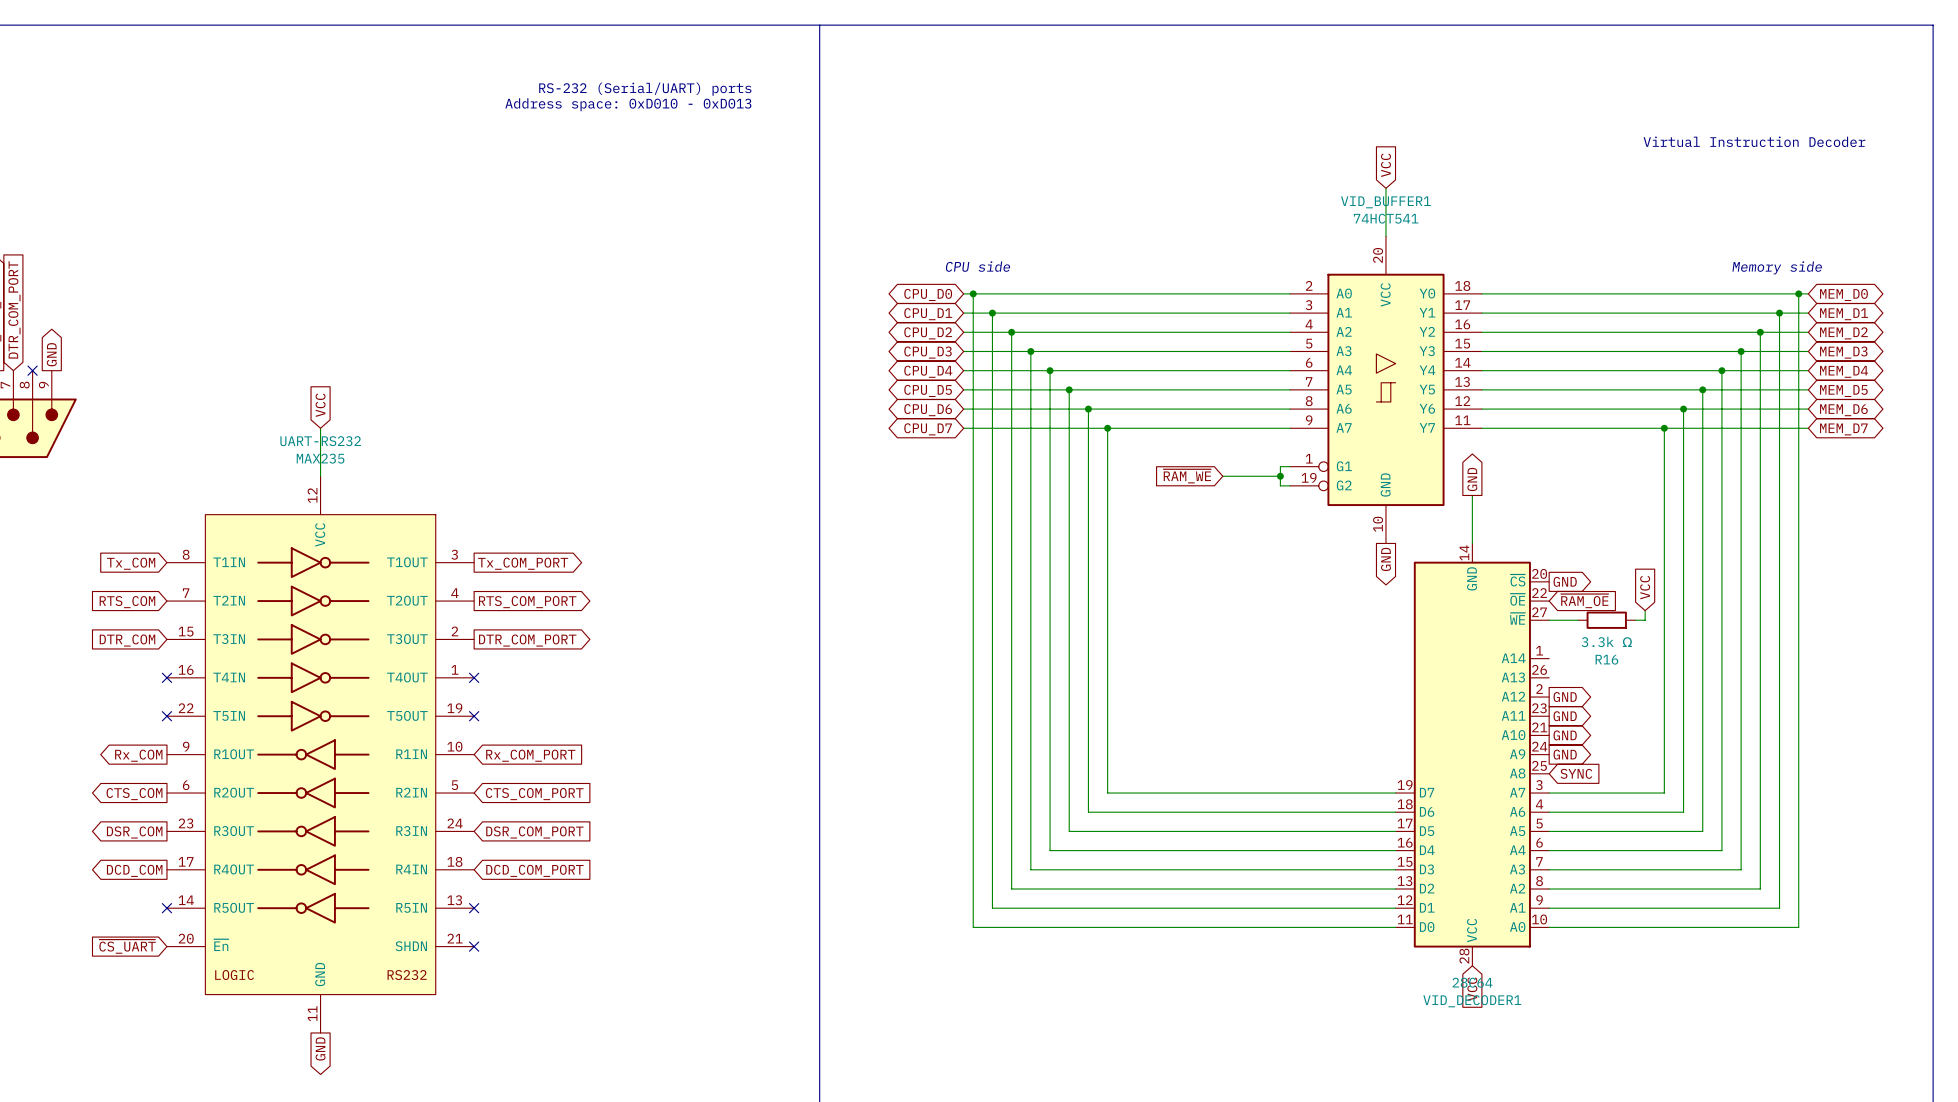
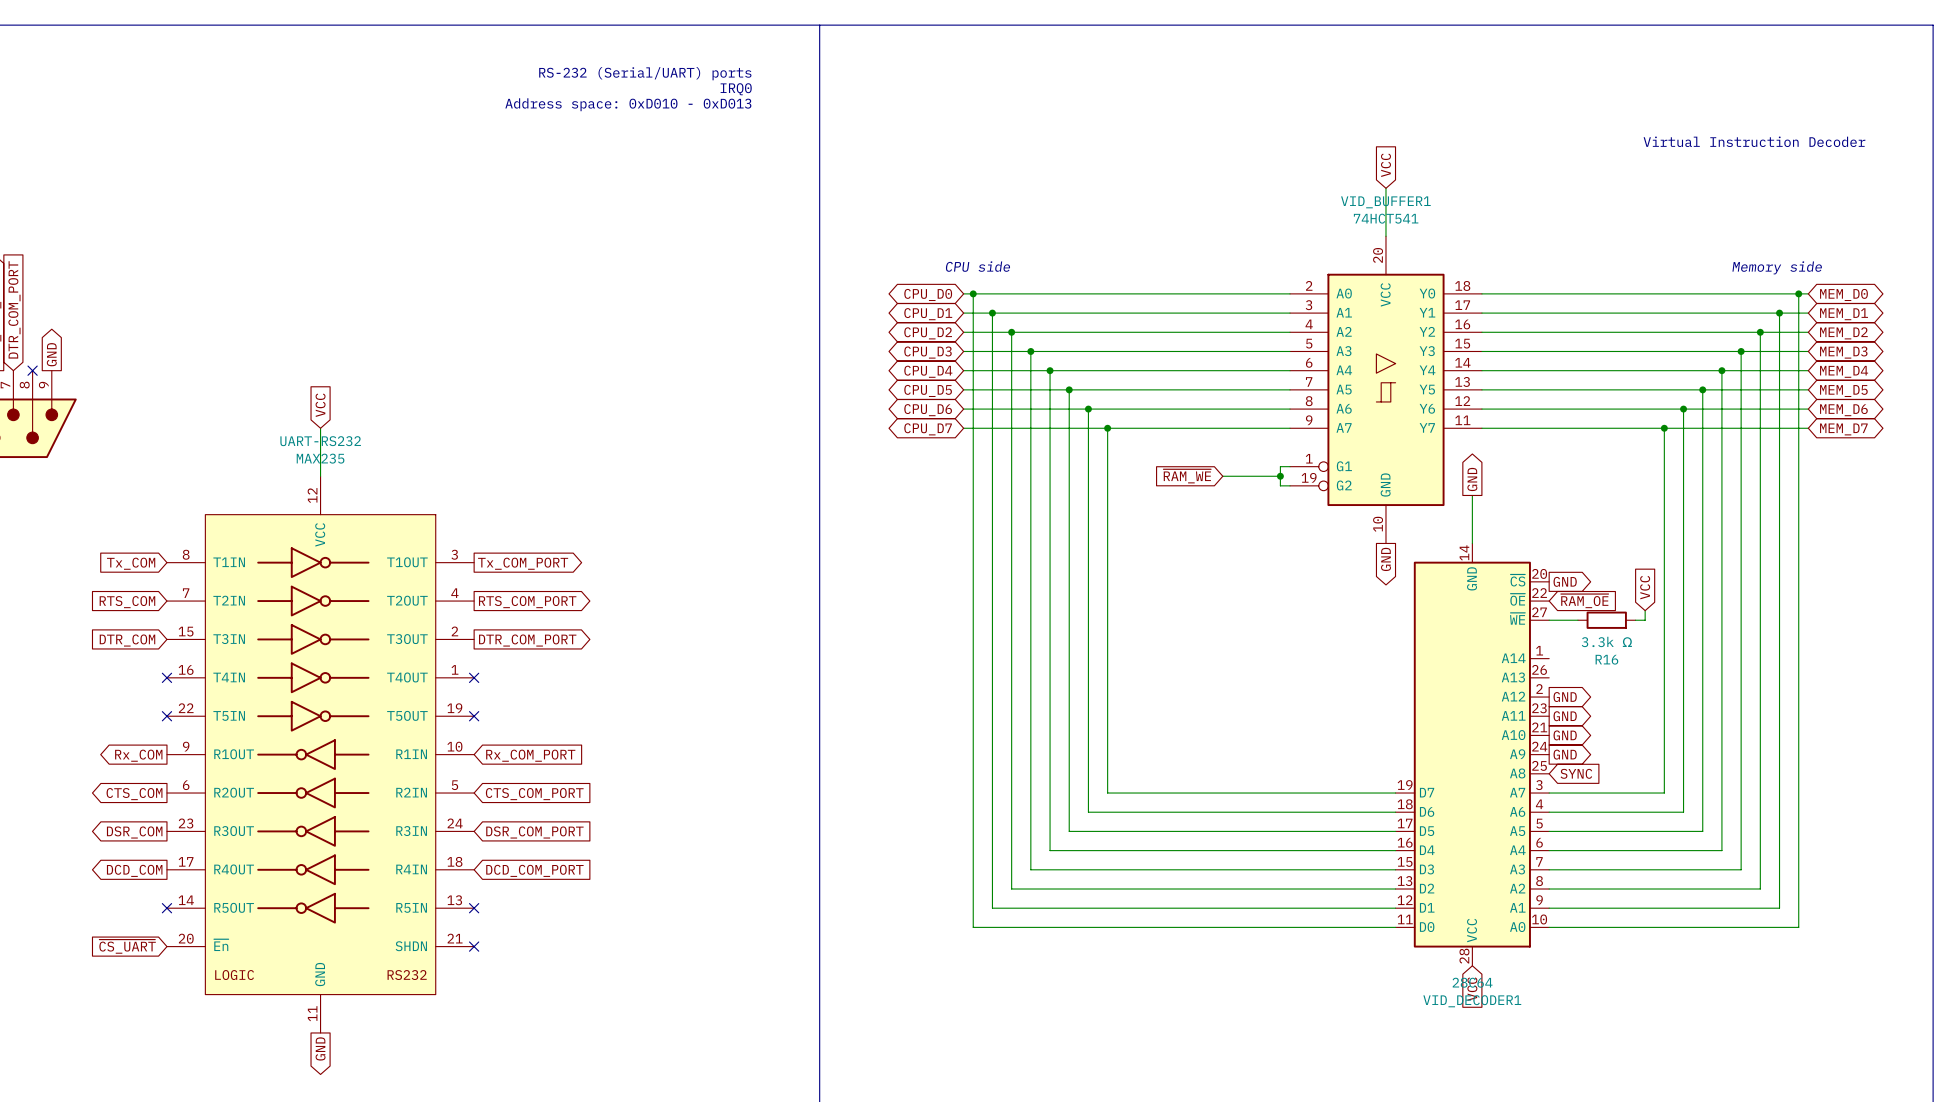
text: none -> RS-232 (Serial/UART) ports (645, 73)
text: RS-232 (Serial/UART) ports (645, 89) -> IRQ0 (736, 89)

